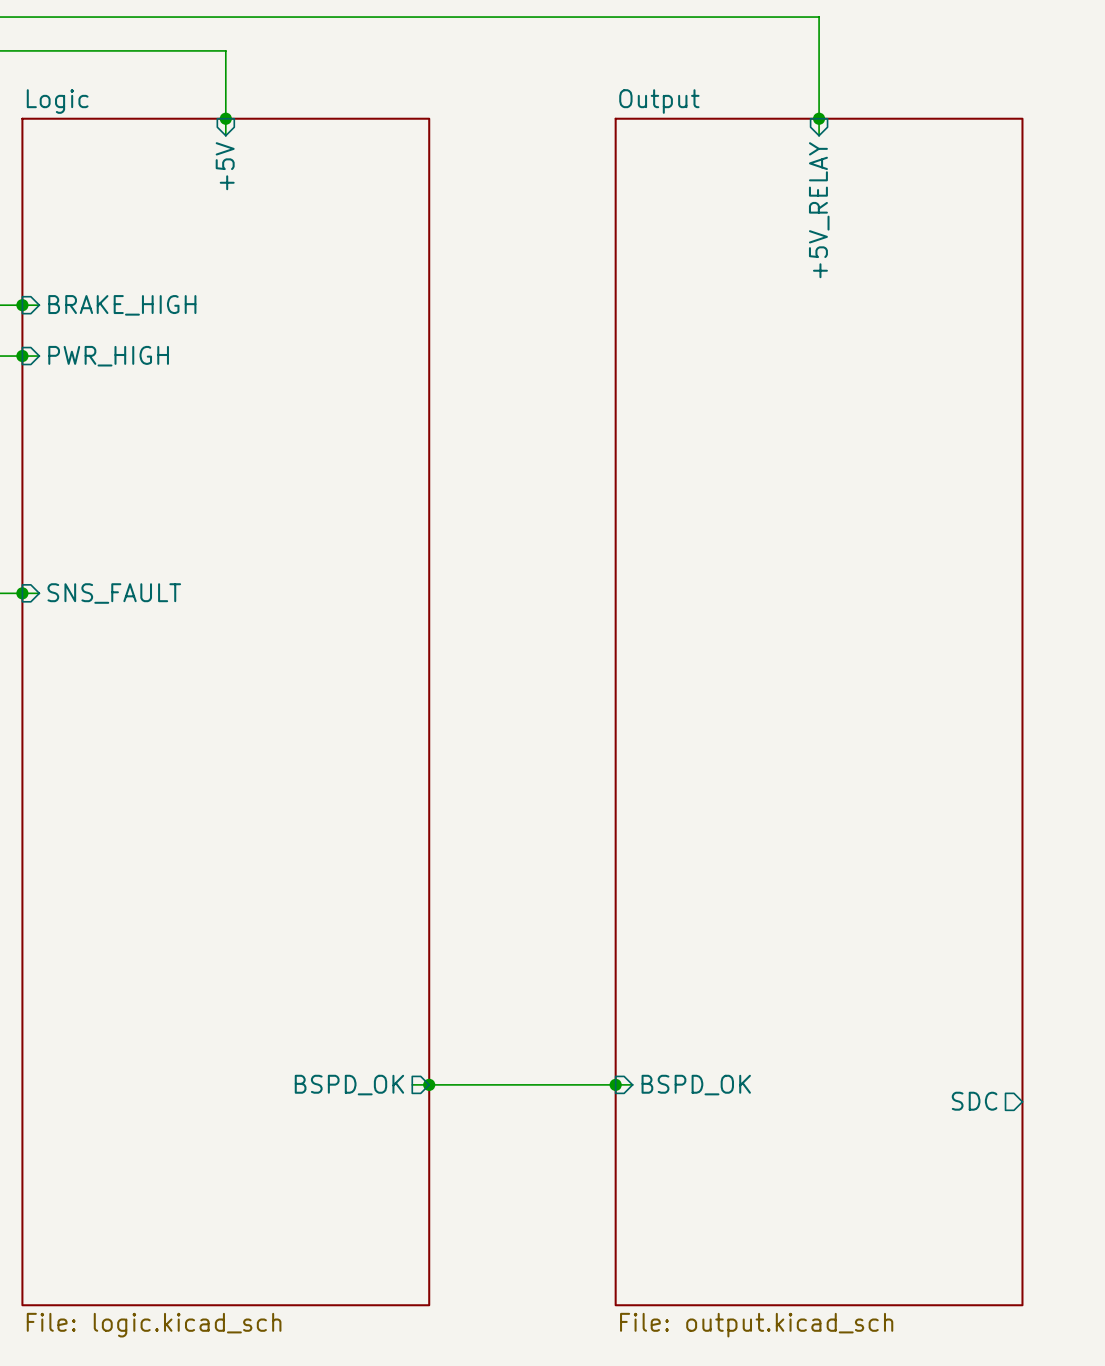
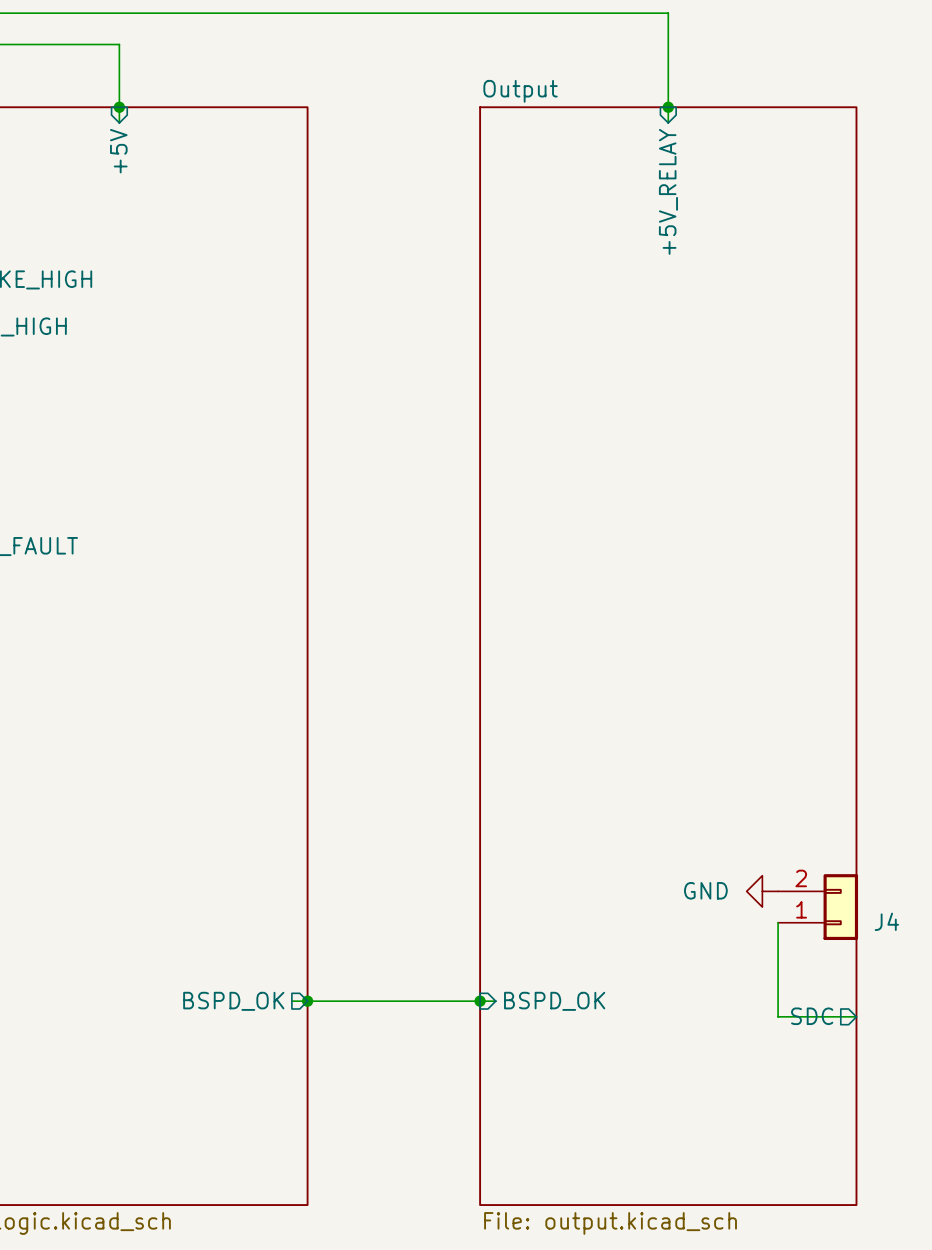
power symbol: none -> GND (762, 891)
J4: none -> (818, 907)
wire: none -> (778, 922) (778, 1016) (856, 1016)

